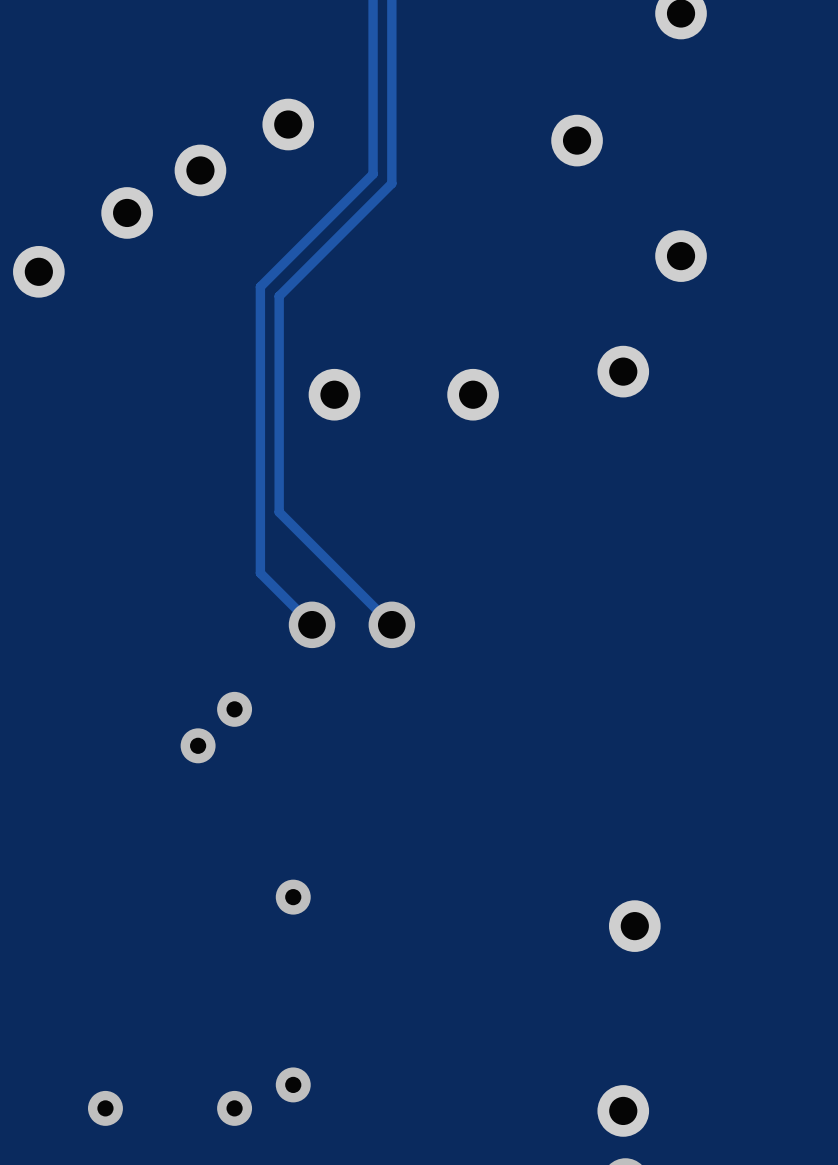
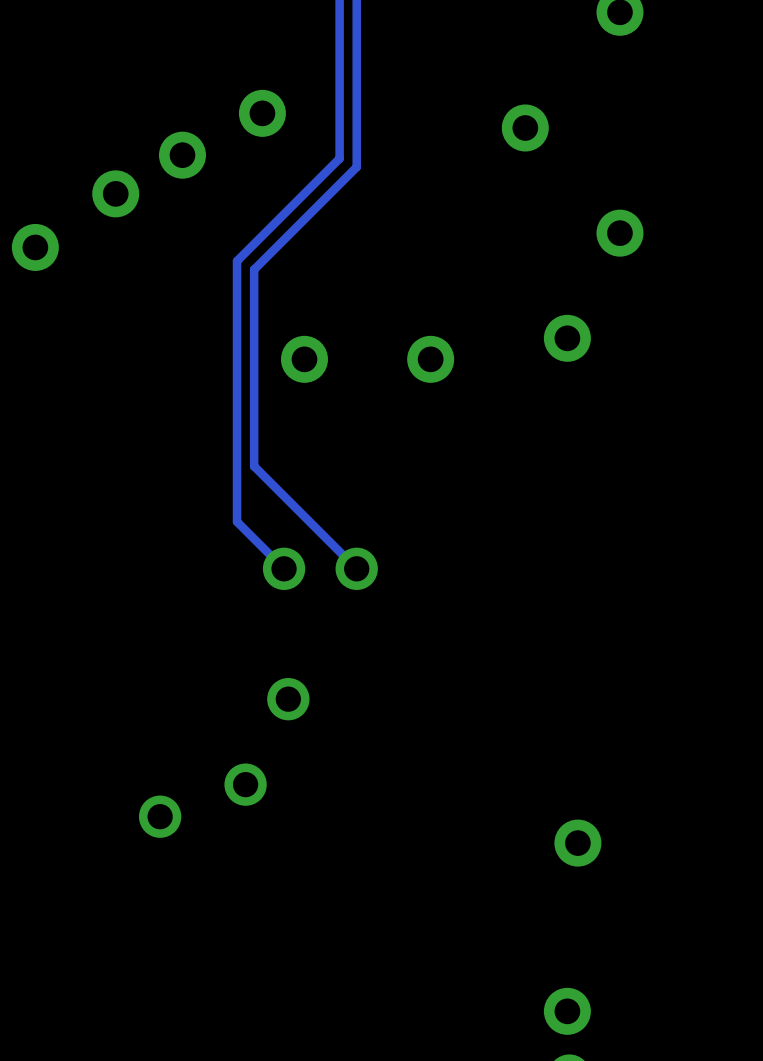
via: (234, 709) -> none
via: (198, 745) -> none
via: none -> (288, 699)
via: none -> (160, 816)
via position: (293, 897) -> (245, 784)
via: (293, 1084) -> none
via: (105, 1108) -> none
via: (234, 1108) -> none

